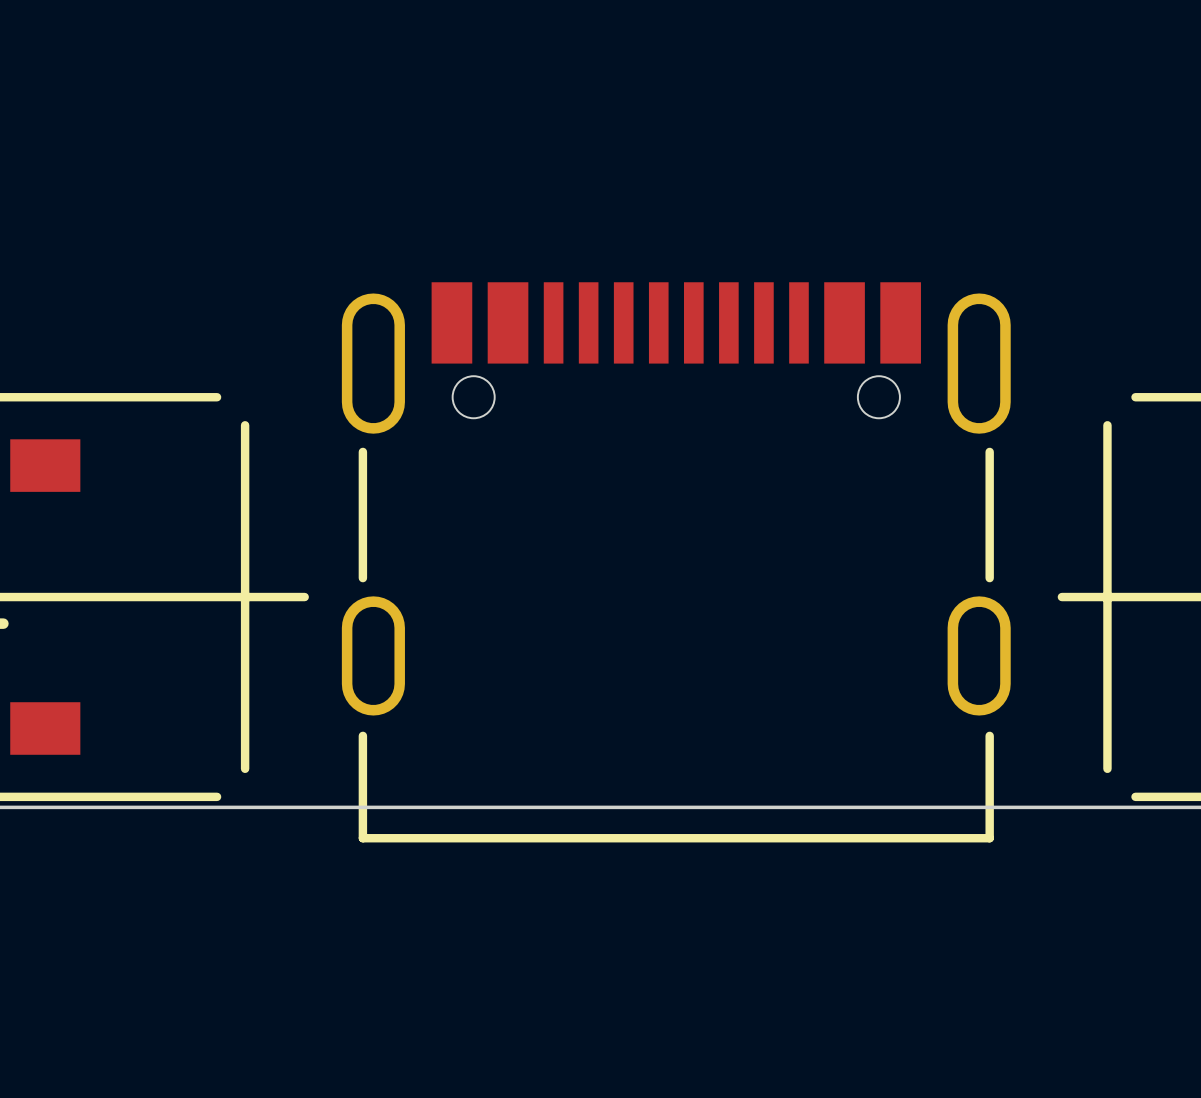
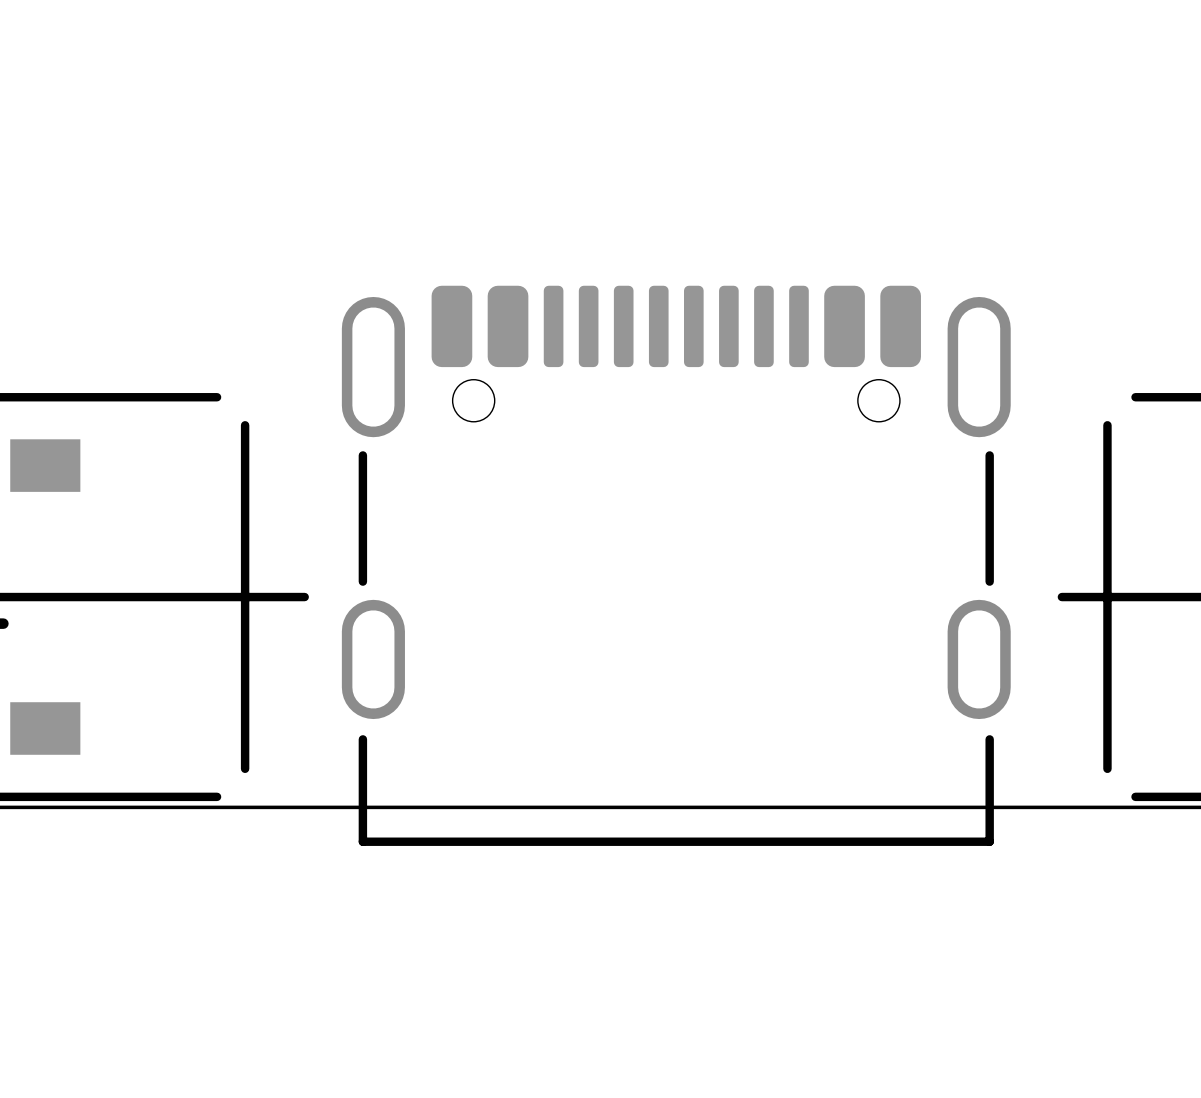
part footprint: [341, 282, 1011, 843] -> [341, 285, 1011, 846]

